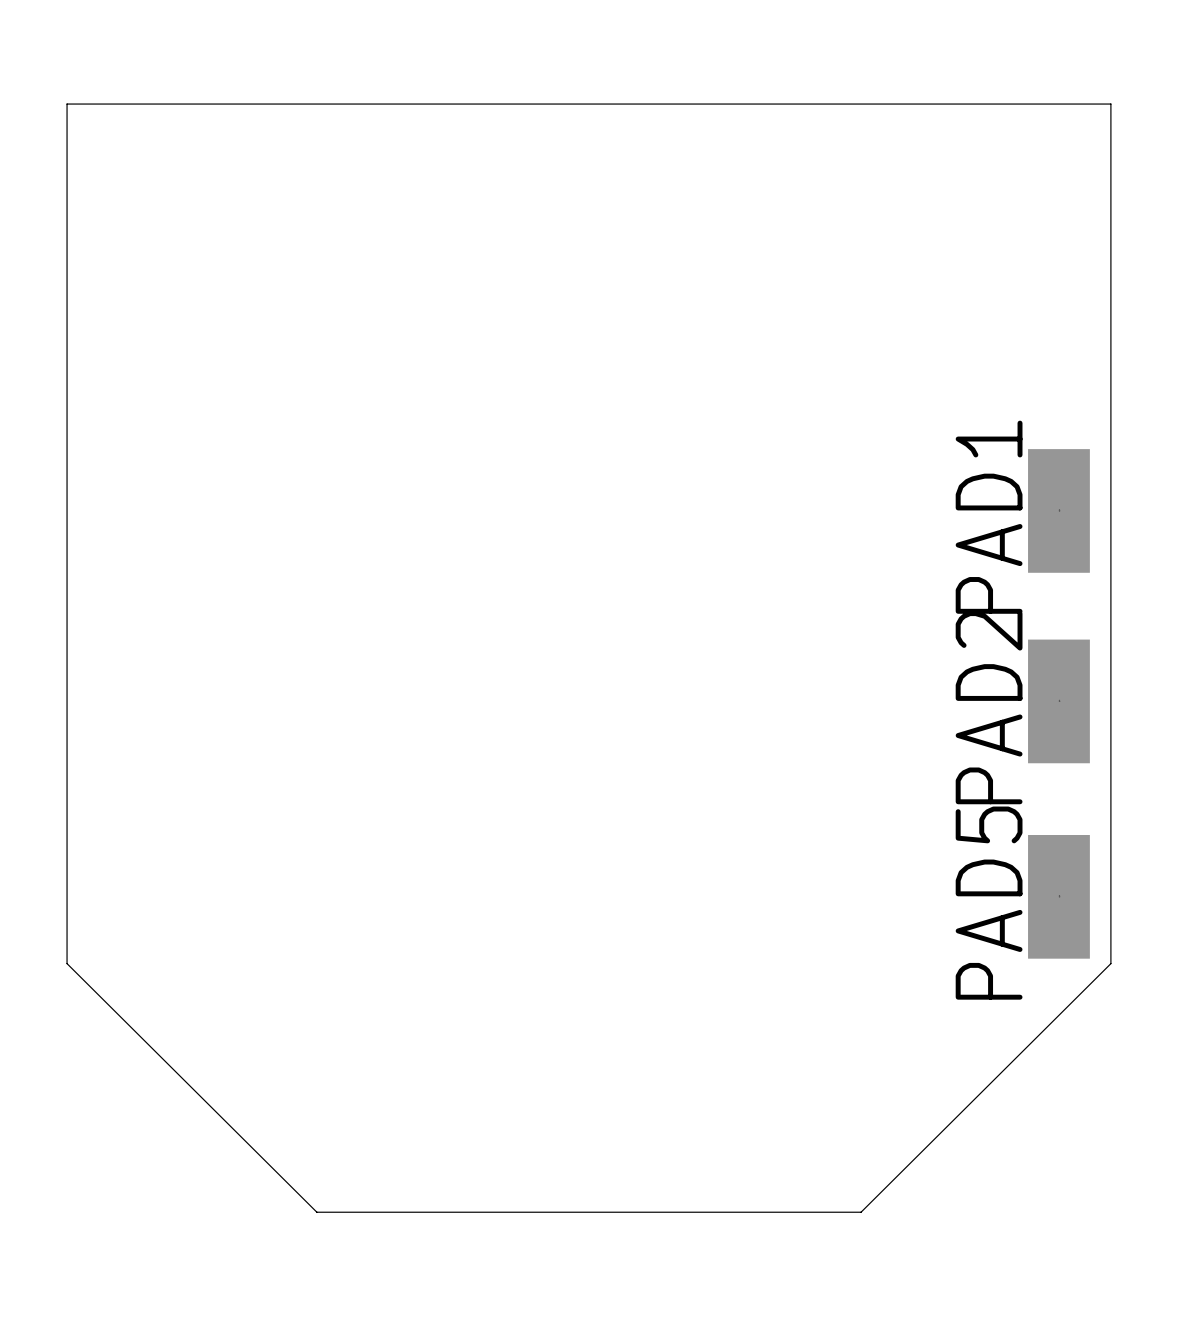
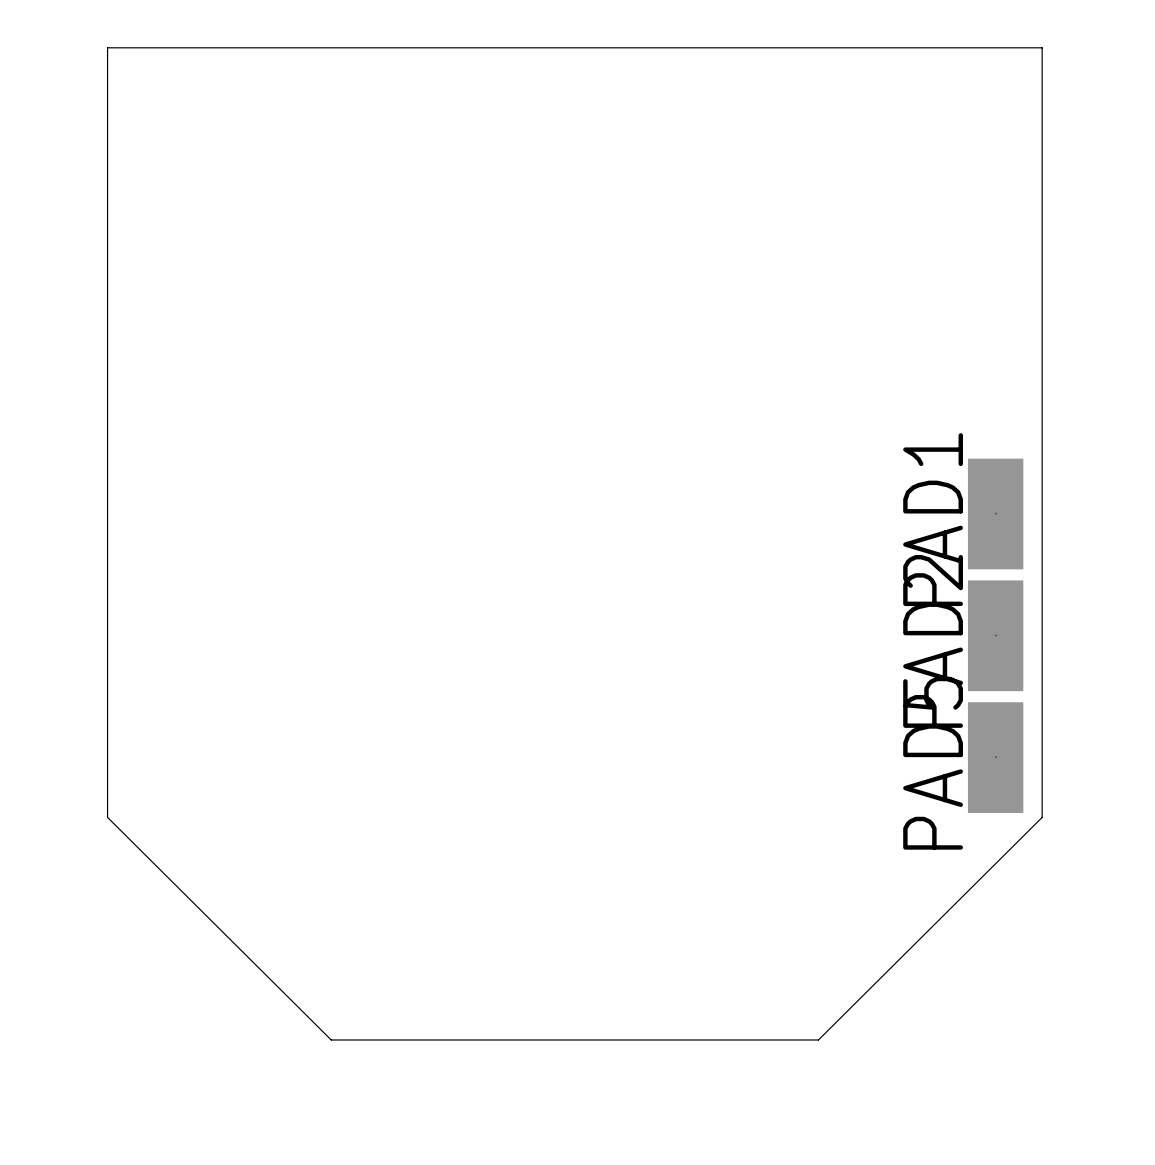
PAD1 position: (1058, 510) -> (995, 514)
PAD2 position: (1058, 701) -> (995, 635)

